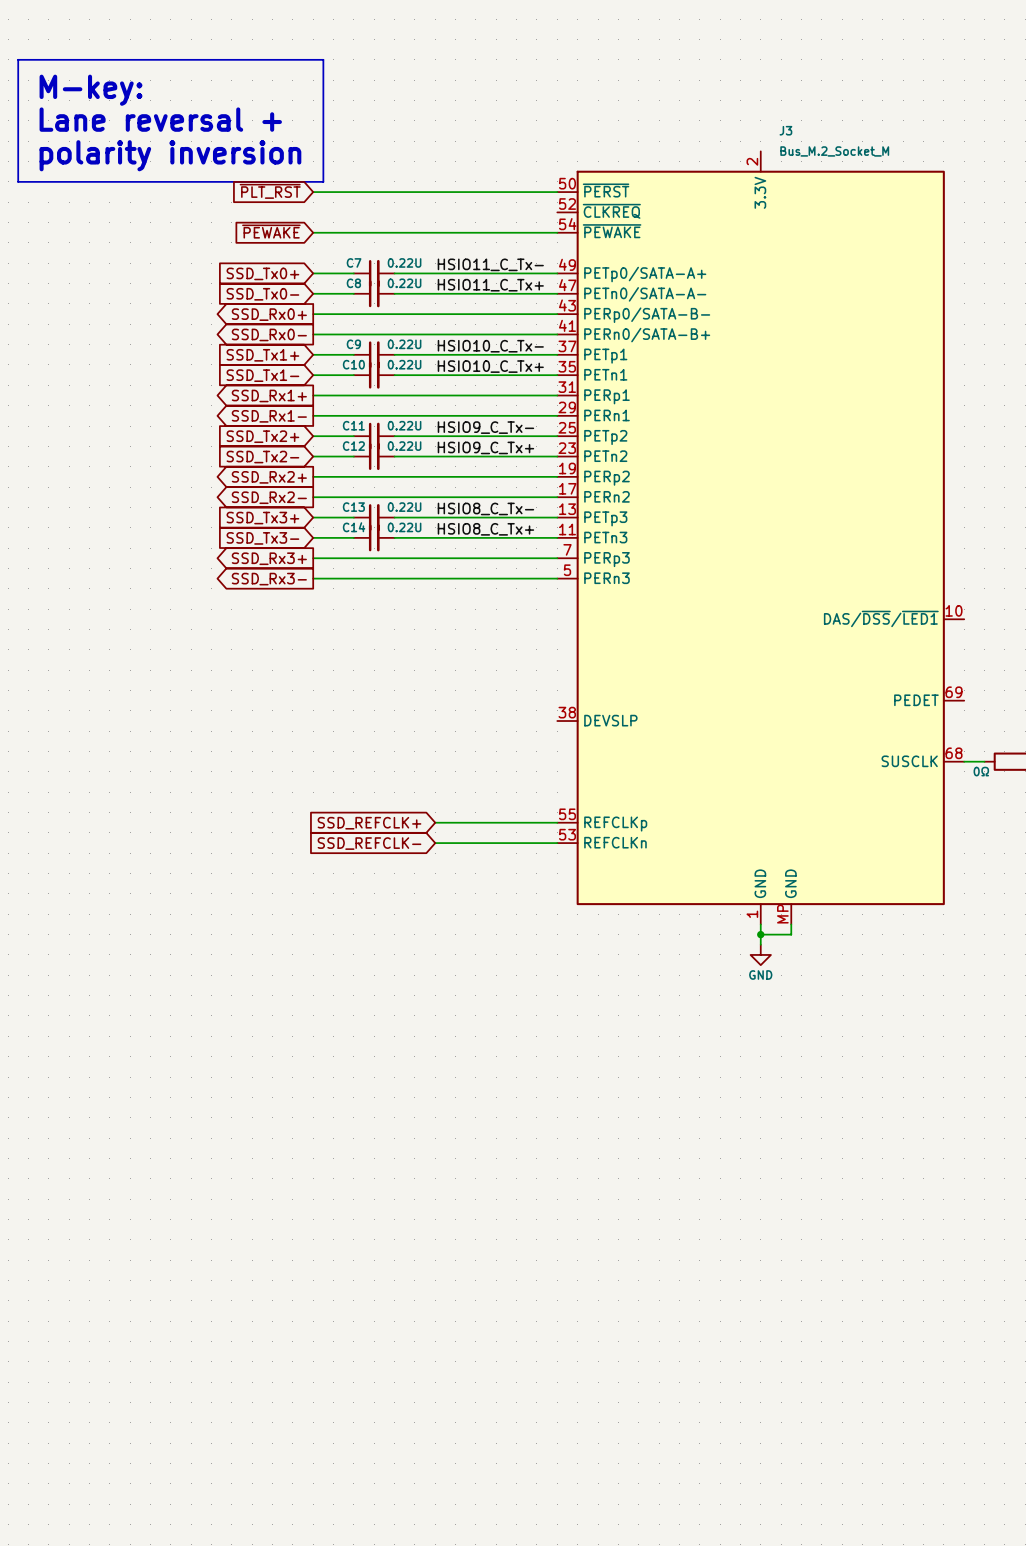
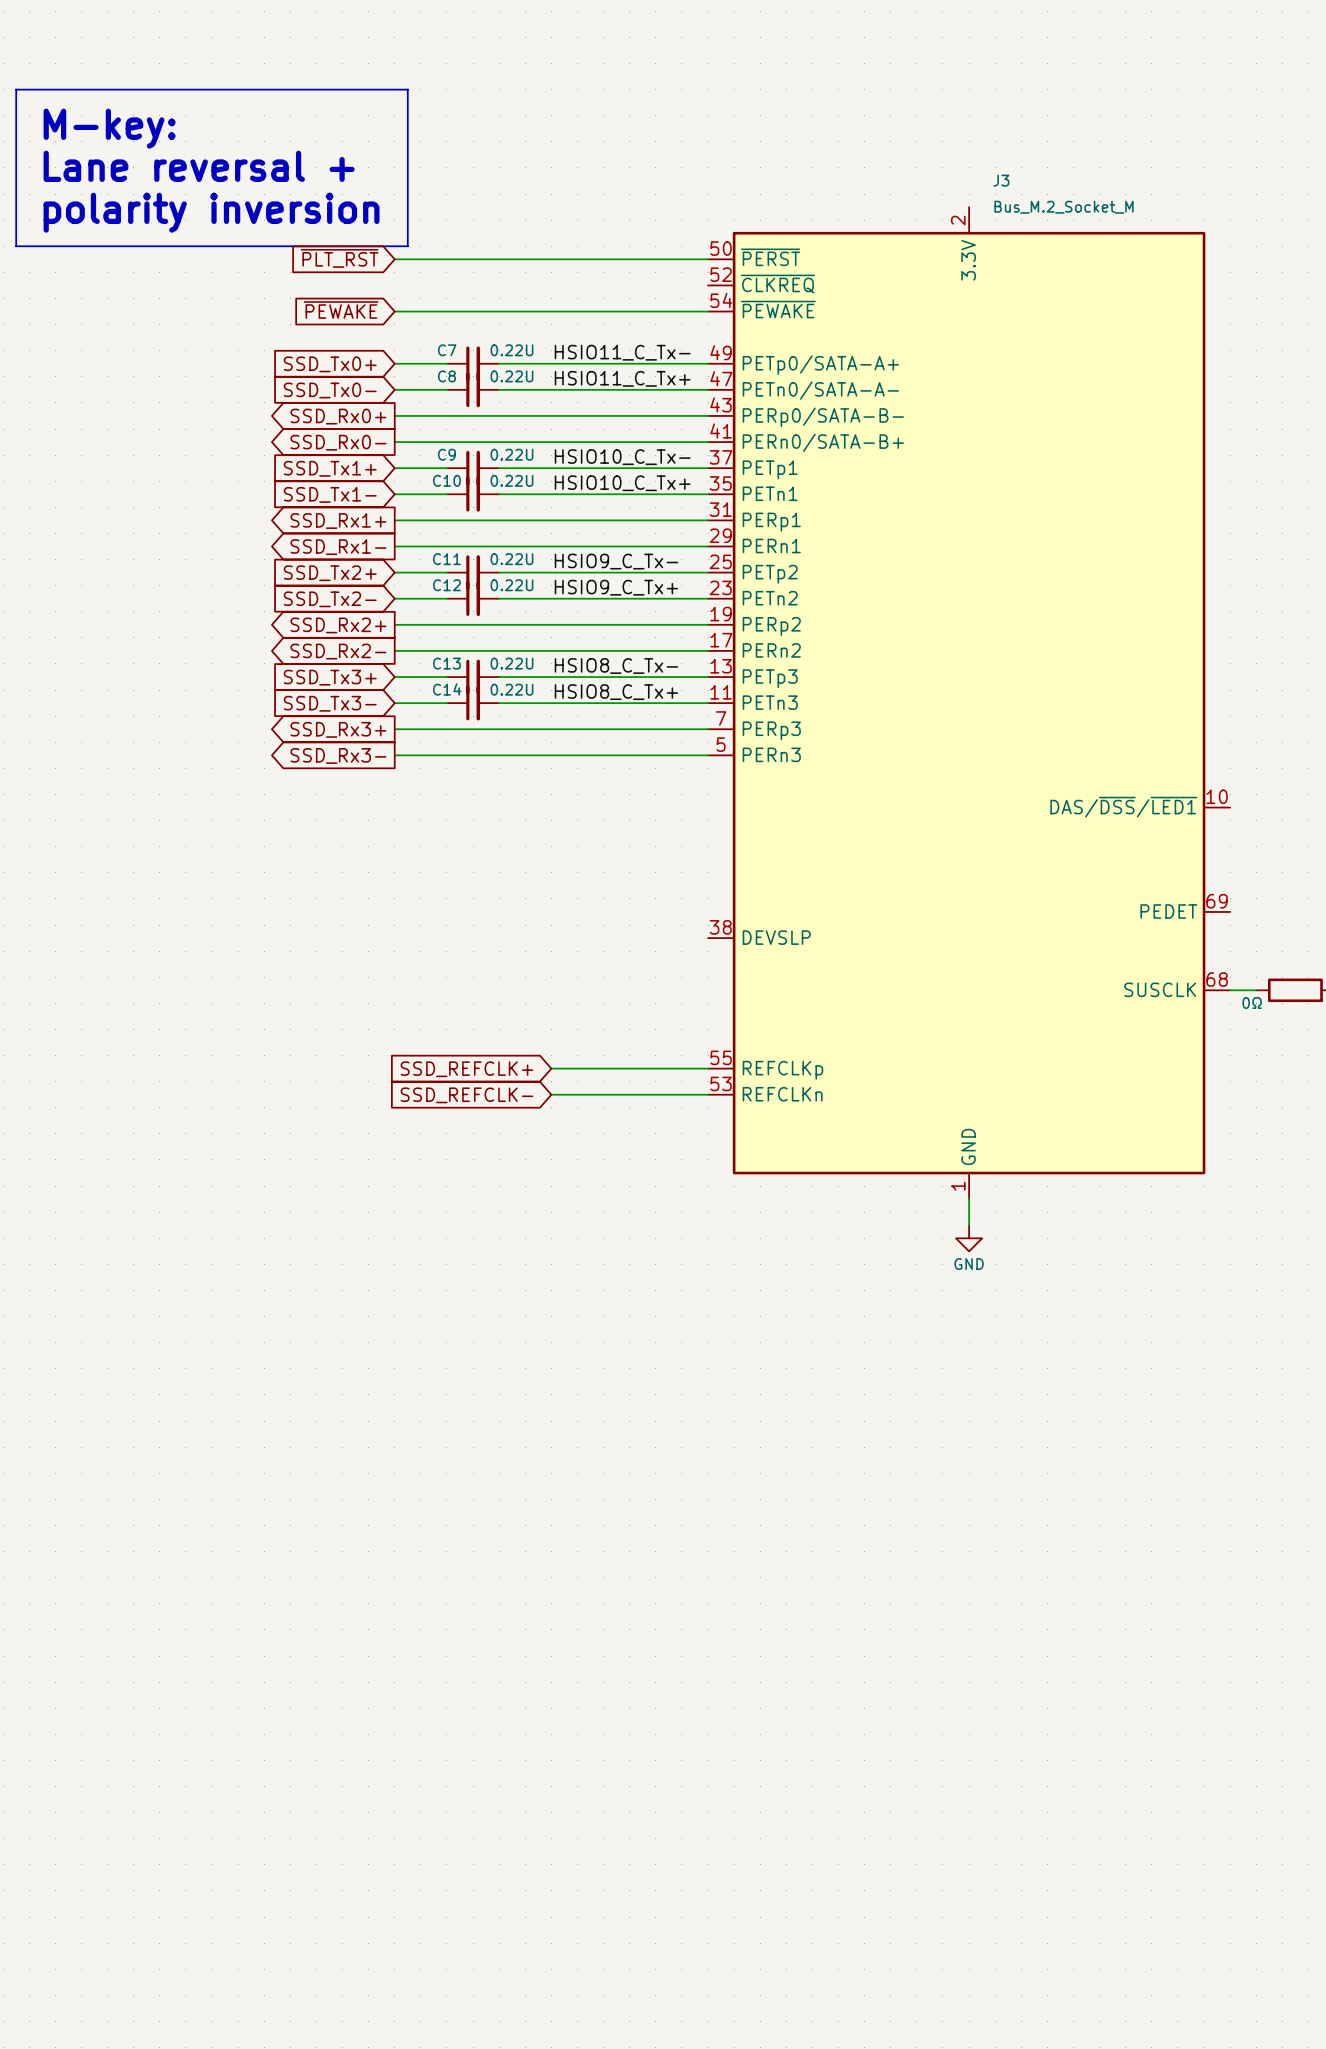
J3 symbol: [557, 151, 965, 925] -> [708, 207, 1231, 1200]
wire: (791, 924) (791, 934) (760, 934) -> none
junction: (760, 934) -> none

